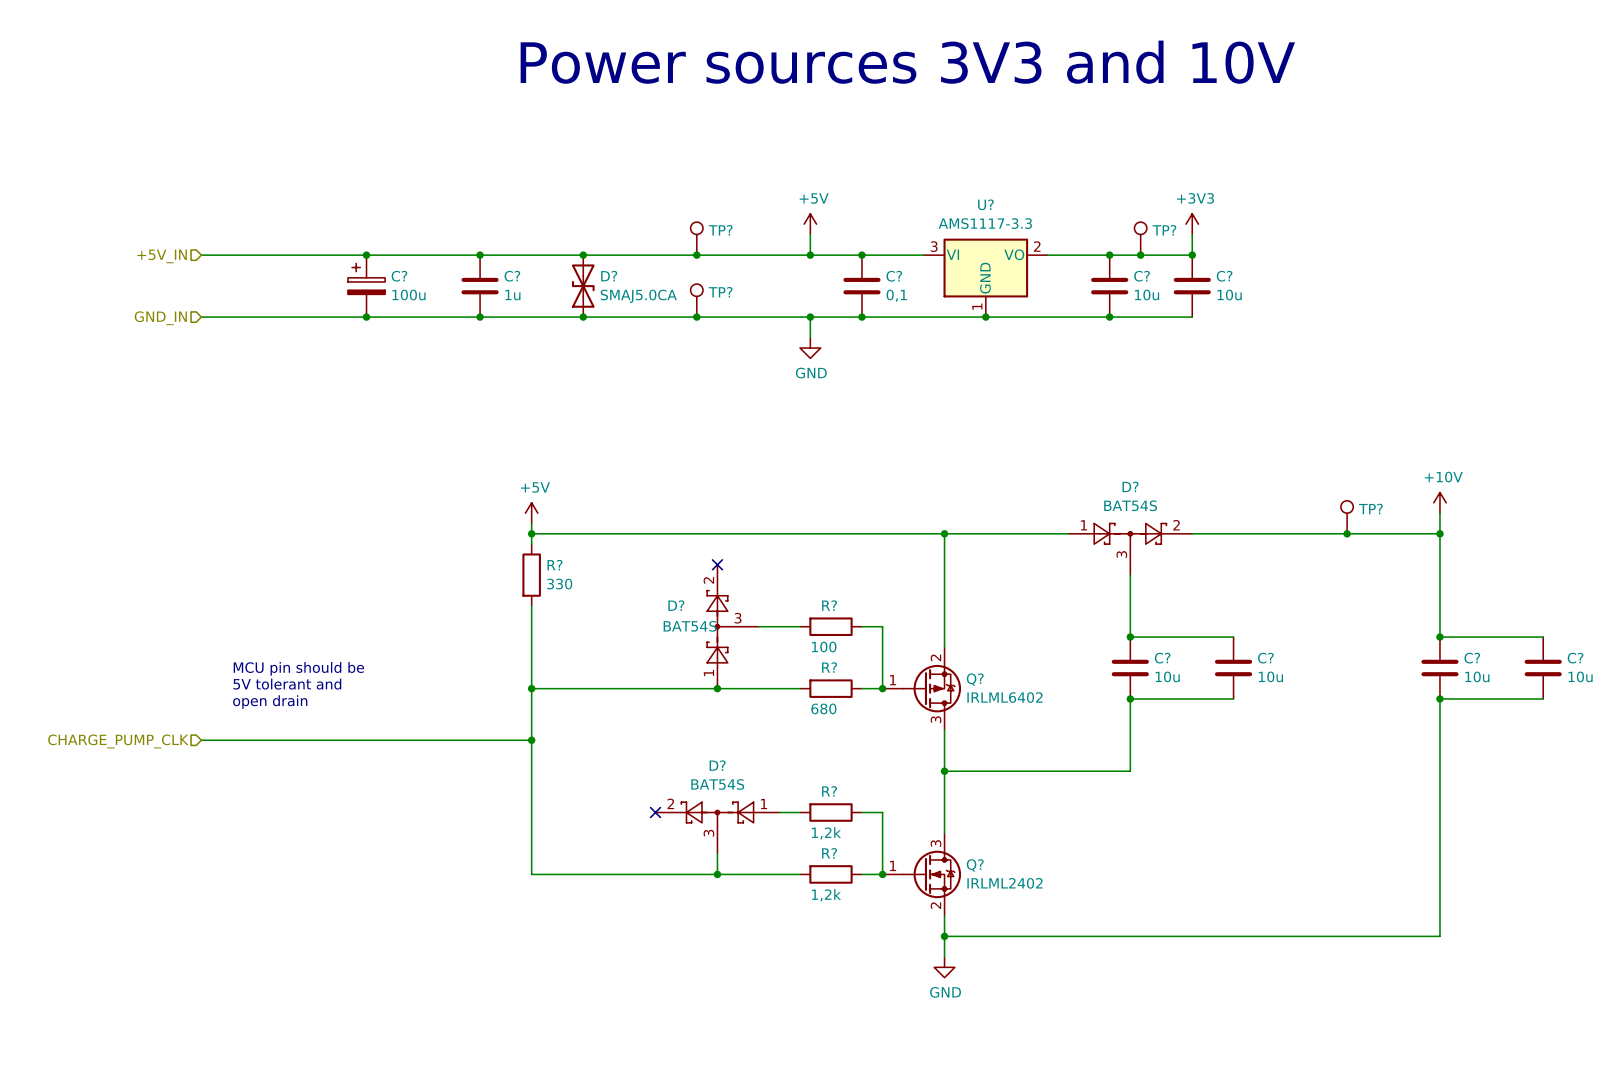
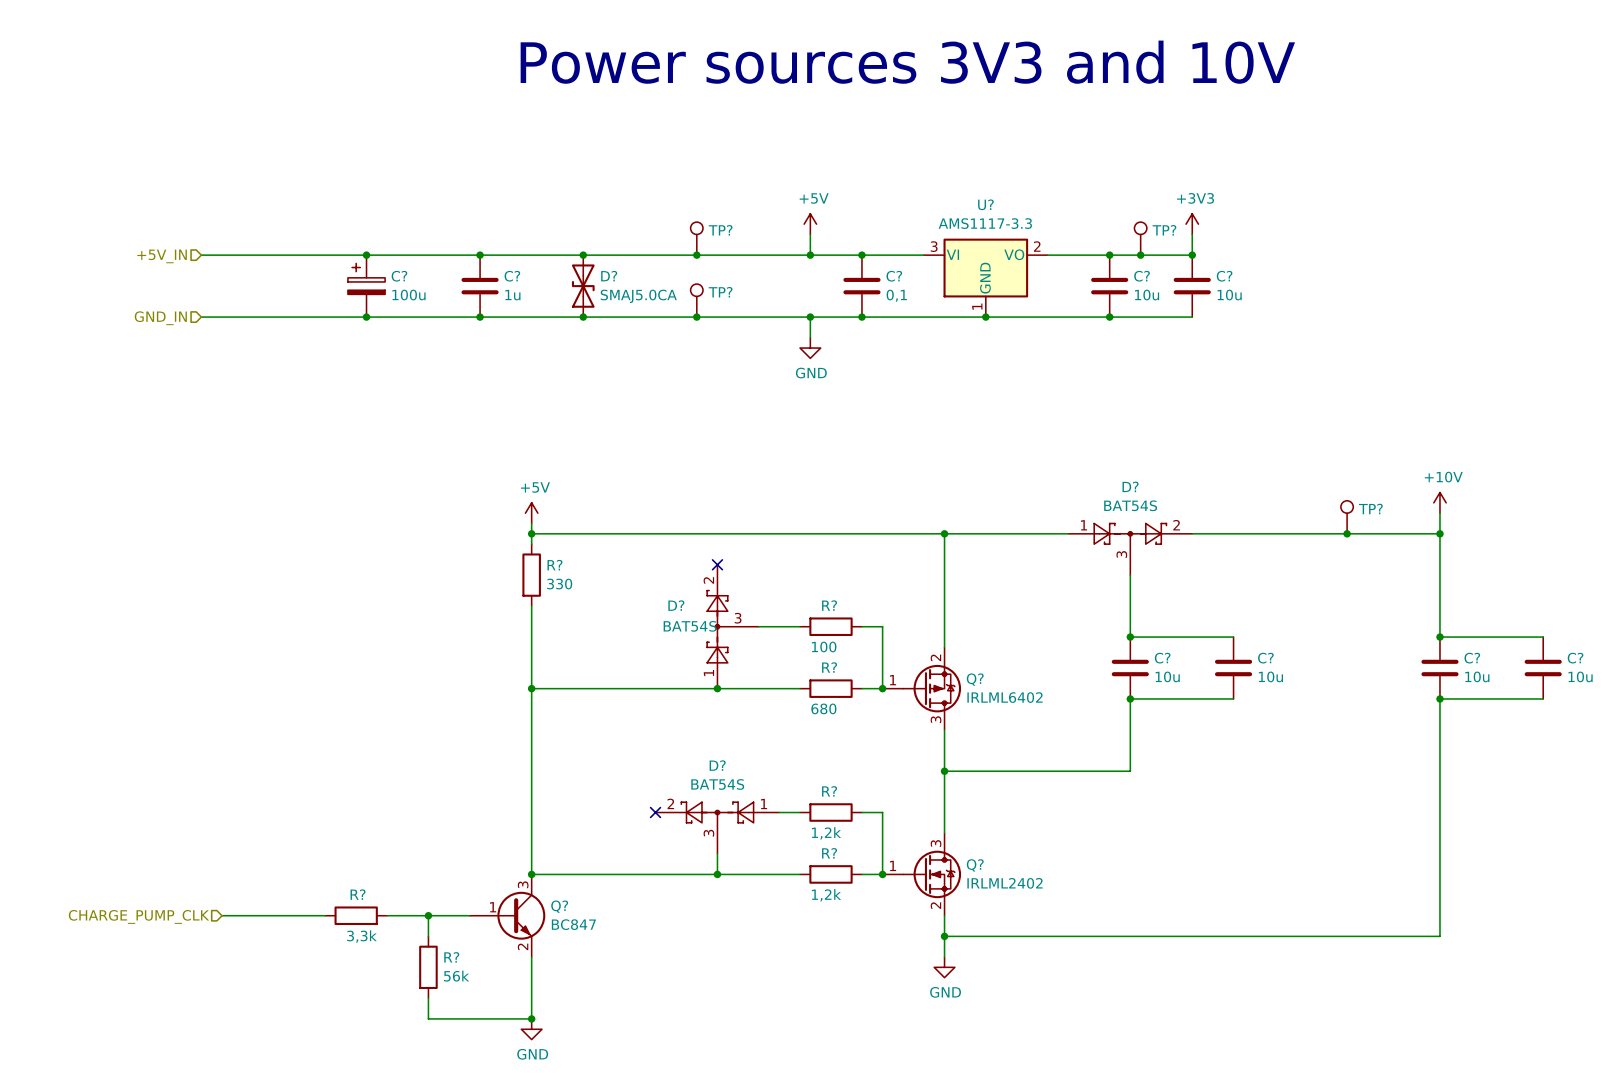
text: MCU pin should be (298, 668) -> none
text: 5V tolerant and (287, 684) -> none
text: open drain (270, 702) -> none
wire: (201, 740) (531, 740) -> none
junction: (531, 740) -> none
hierarchical label position: CHARGE_PUMP_CLK (118, 741) -> CHARGE_PUMP_CLK (139, 916)
junction: none -> (531, 874)
wire: none -> (222, 915) (325, 915)
R?: none -> 3,3k (356, 915)
wire: none -> (387, 915) (469, 915)
wire: none -> (428, 915) (428, 936)
junction: none -> (428, 915)
Q?: none -> BC847 (507, 915)
wire: none -> (531, 957) (531, 1018) (428, 1018) (428, 998)
R?: none -> 56k (428, 967)
junction: none -> (531, 1018)
power symbol: none -> GND (531, 1029)

